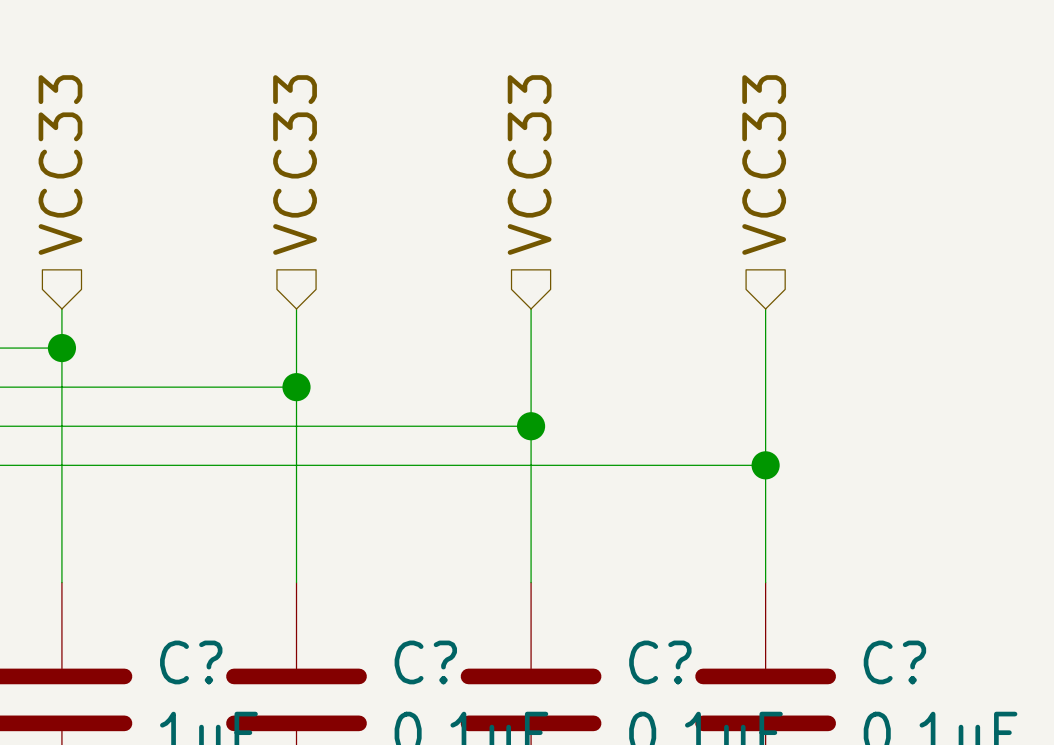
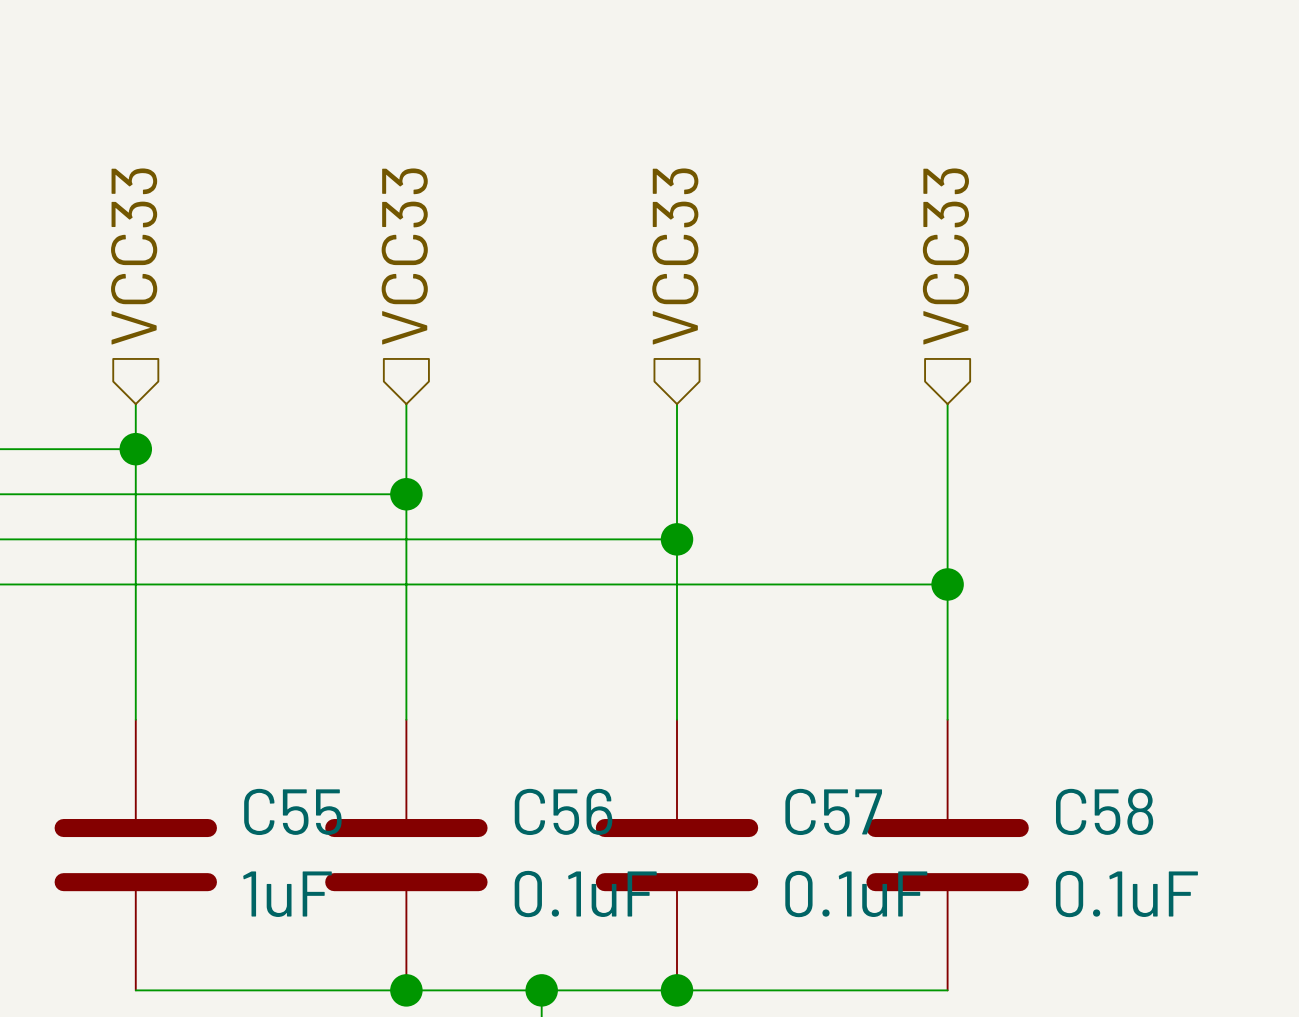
C? name: C? (191, 662) -> C55 (292, 811)
C? name: C? (425, 662) -> C56 (563, 811)
C? name: C? (660, 662) -> C57 (833, 811)
C? name: C? (894, 662) -> C58 (1104, 811)

